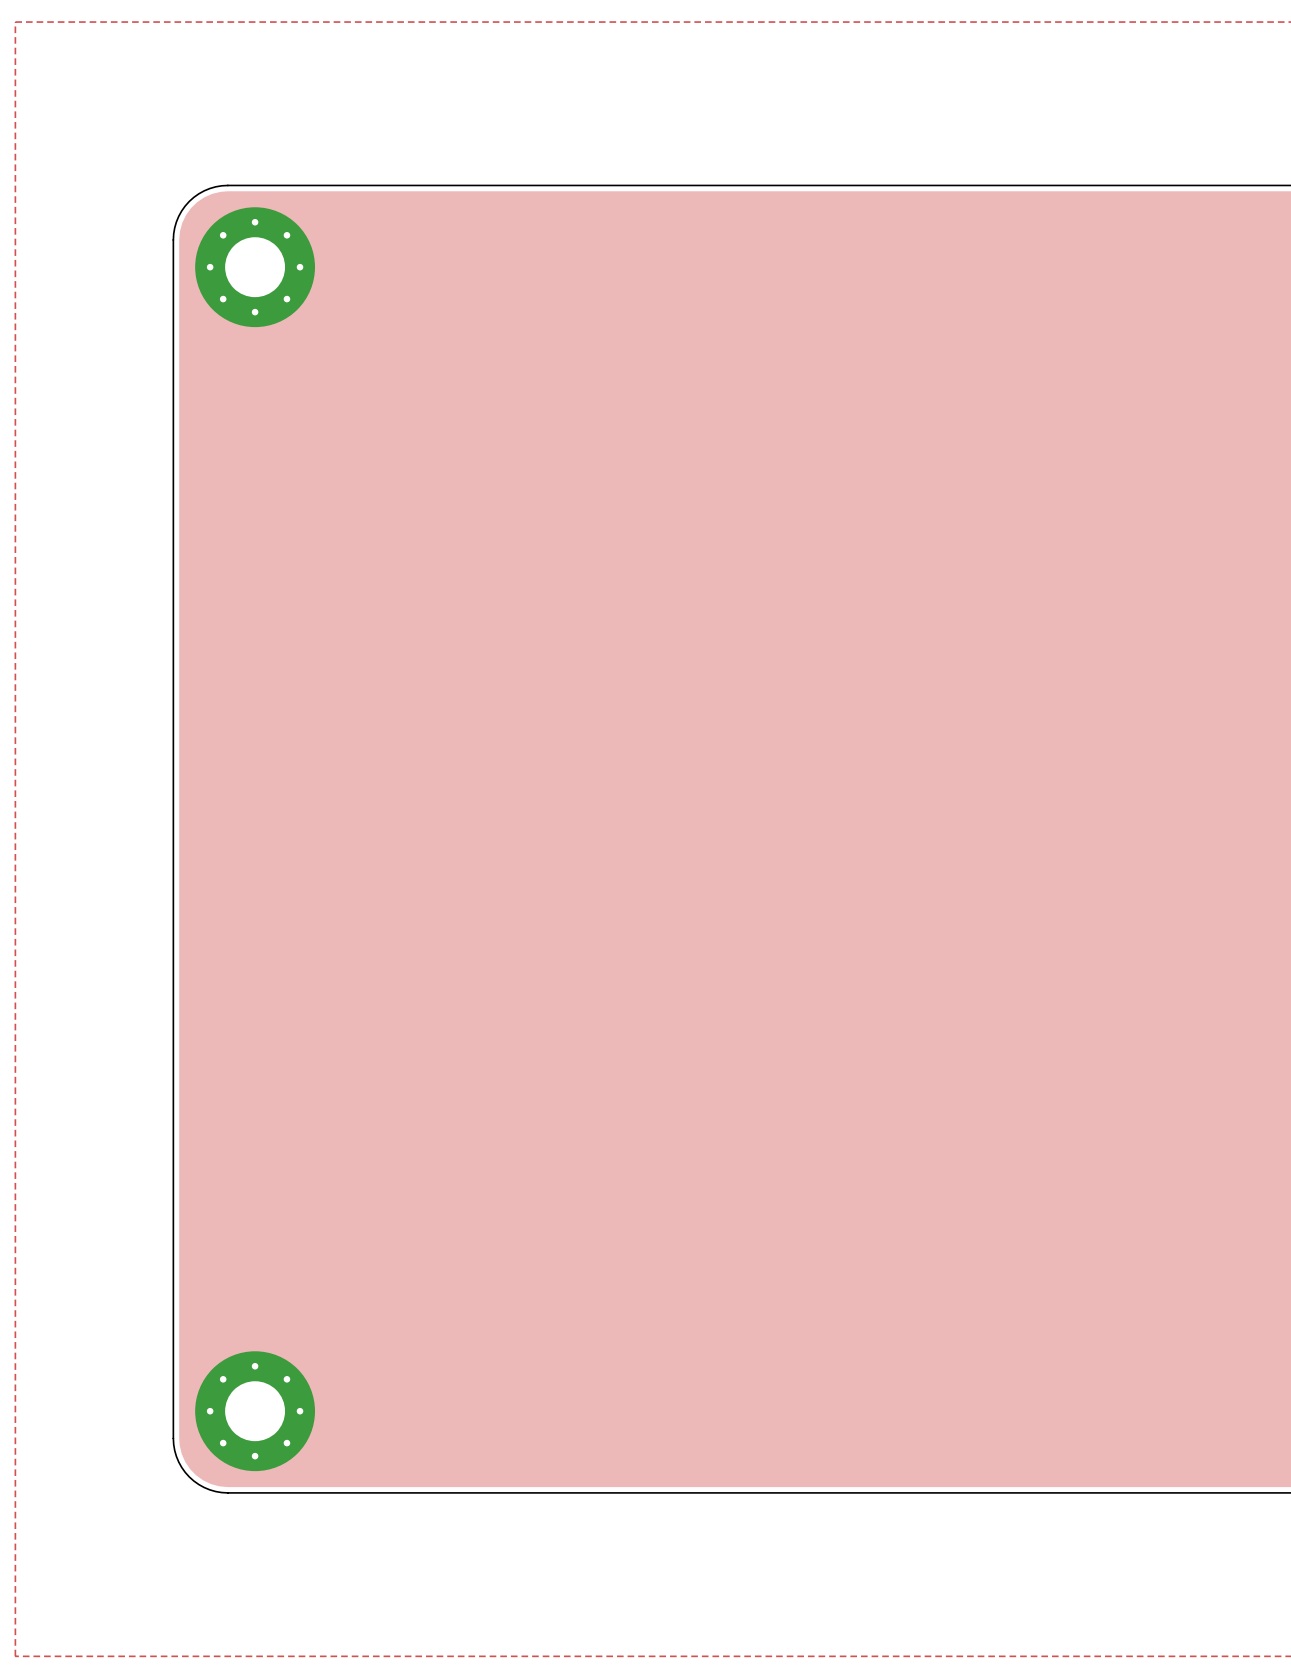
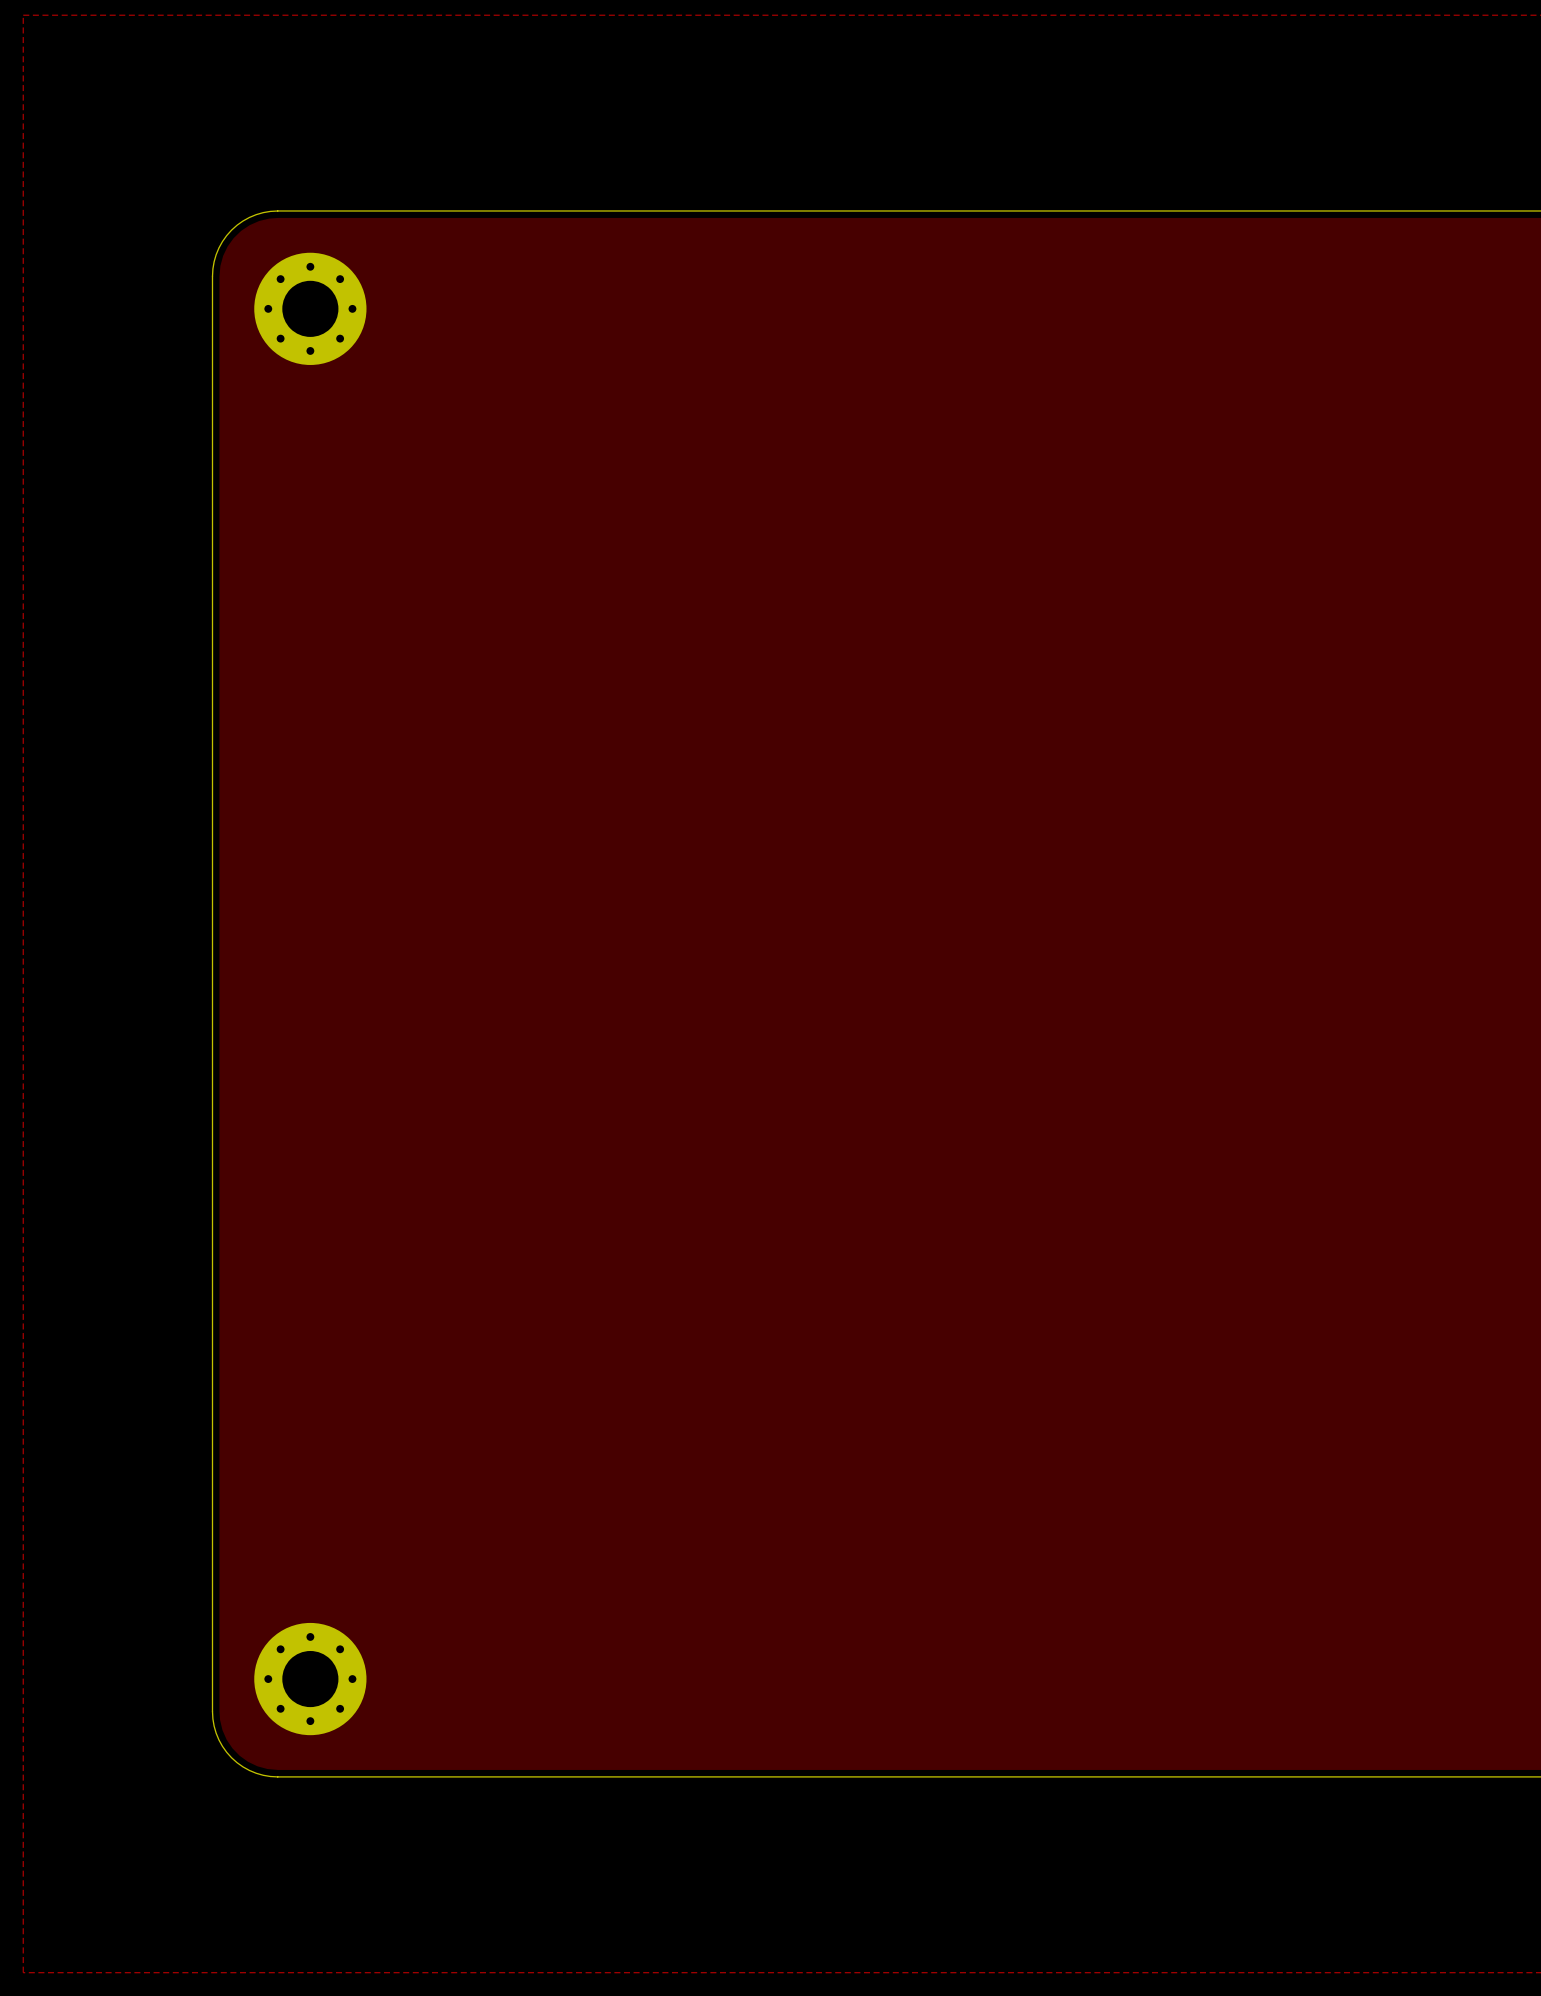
part footprint: [195, 207, 316, 328] -> [254, 252, 367, 365]
part footprint: [195, 1351, 316, 1472] -> [254, 1622, 367, 1736]

